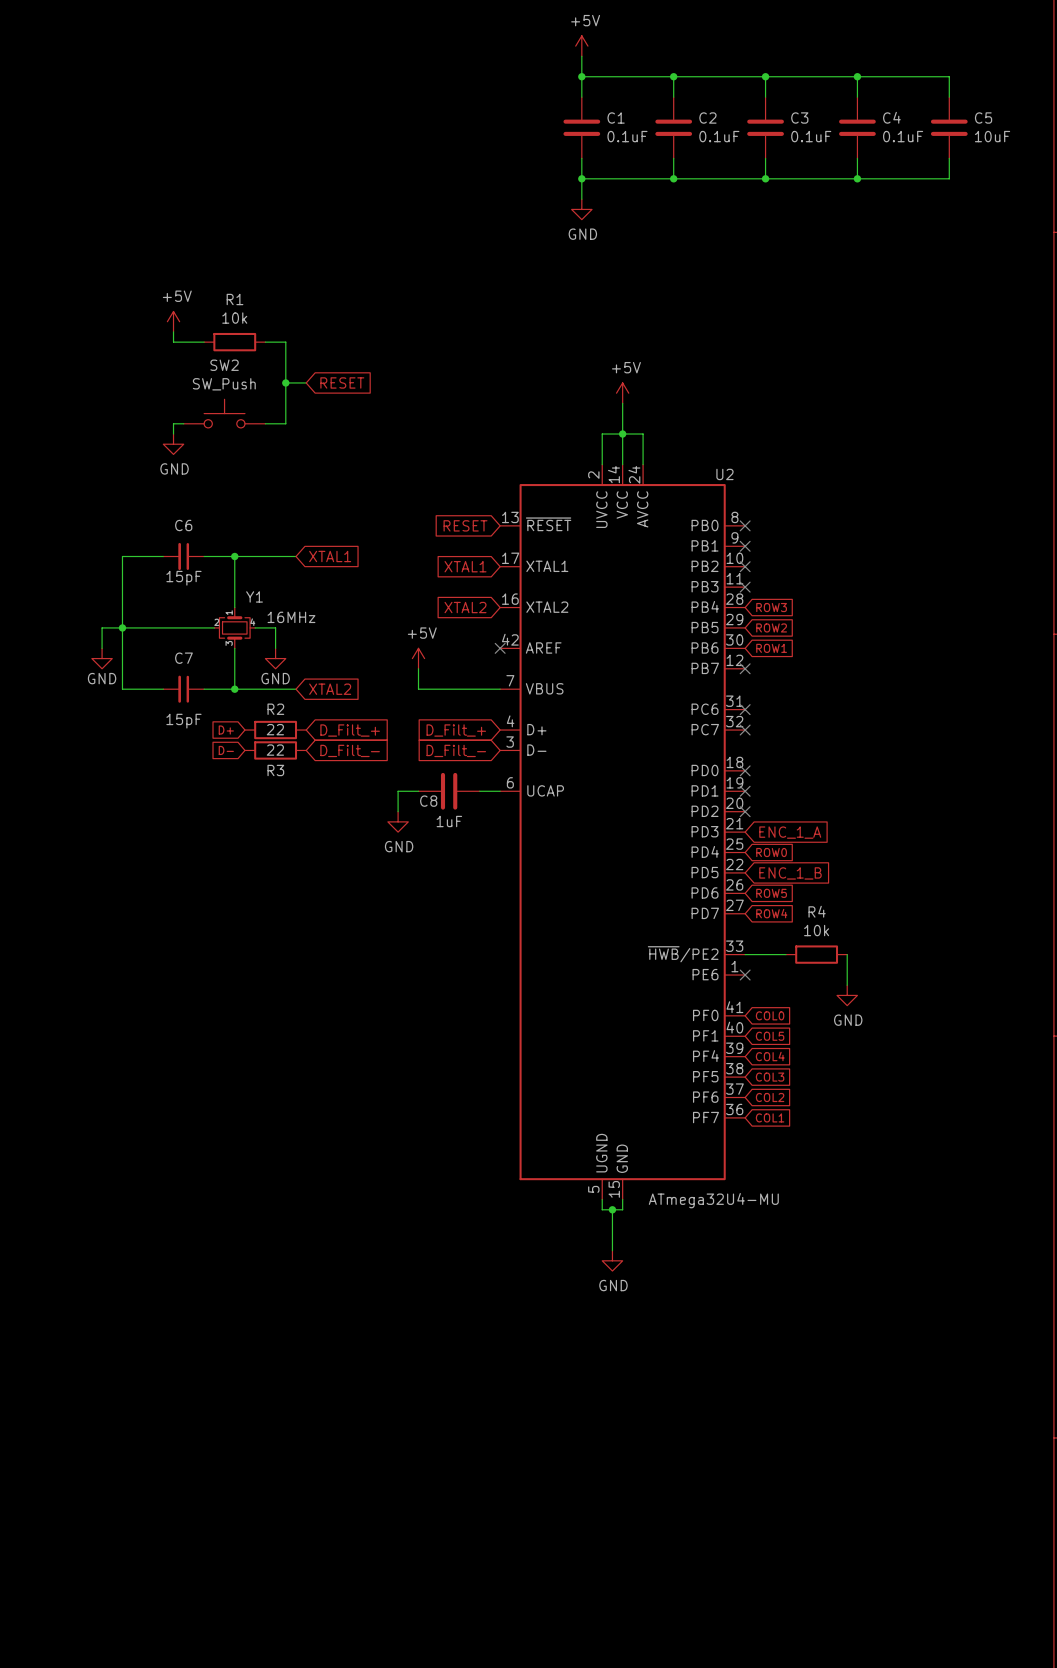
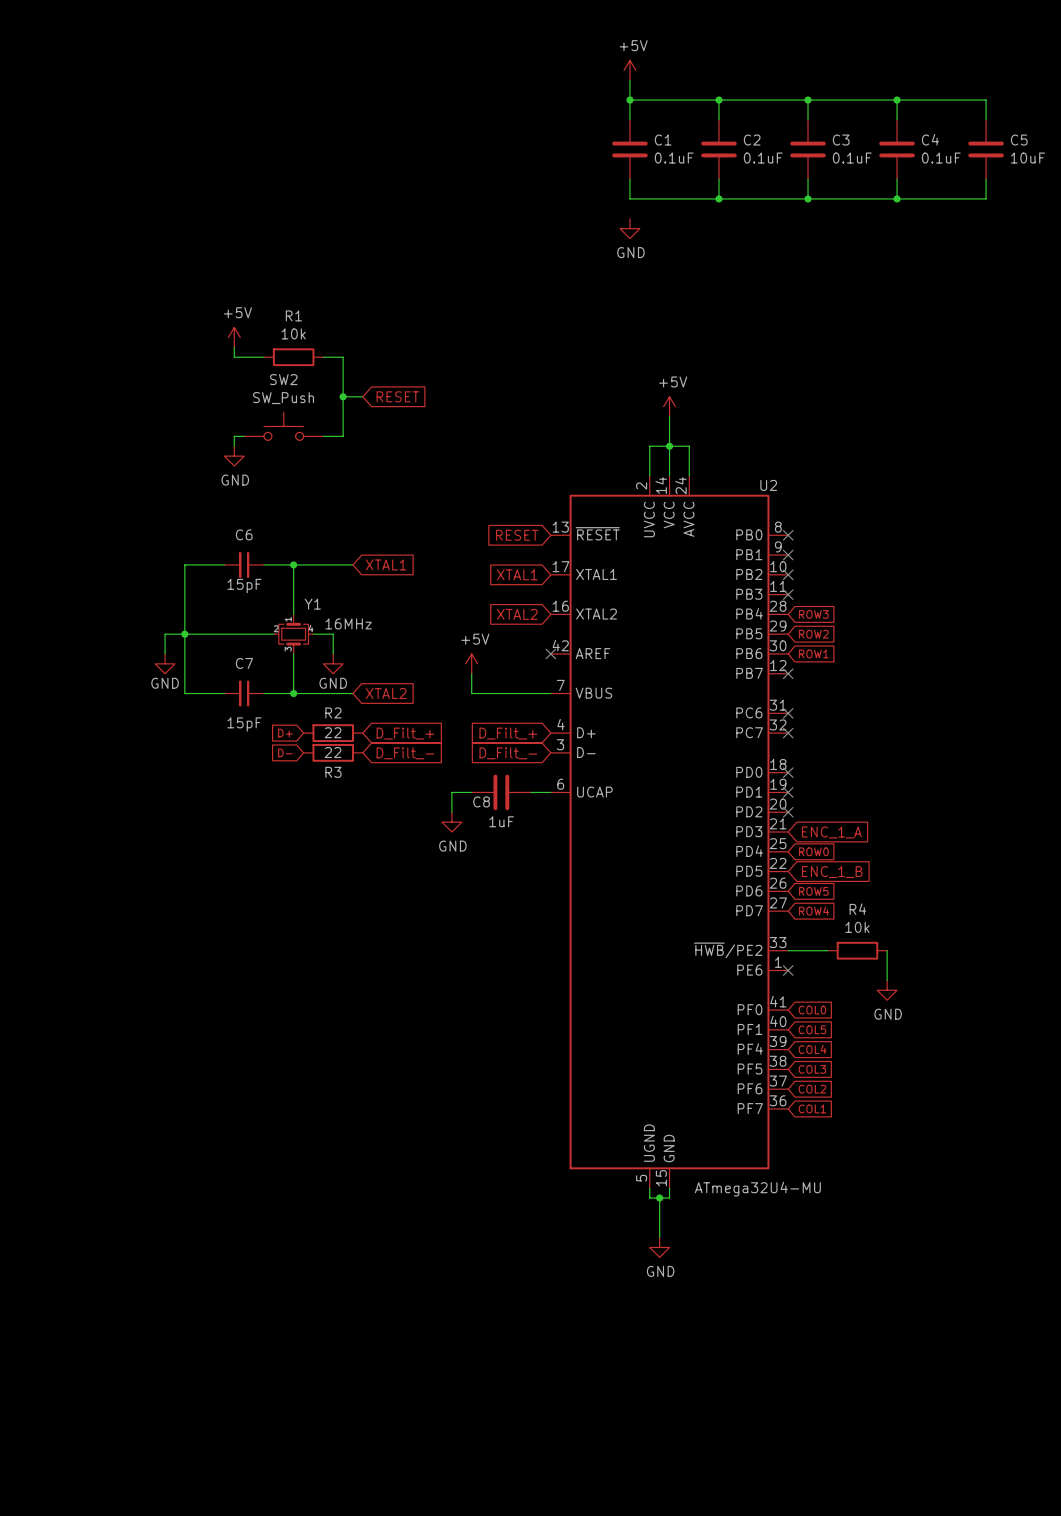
wire: (581, 178) (581, 199) -> none
junction: (581, 178) -> none

